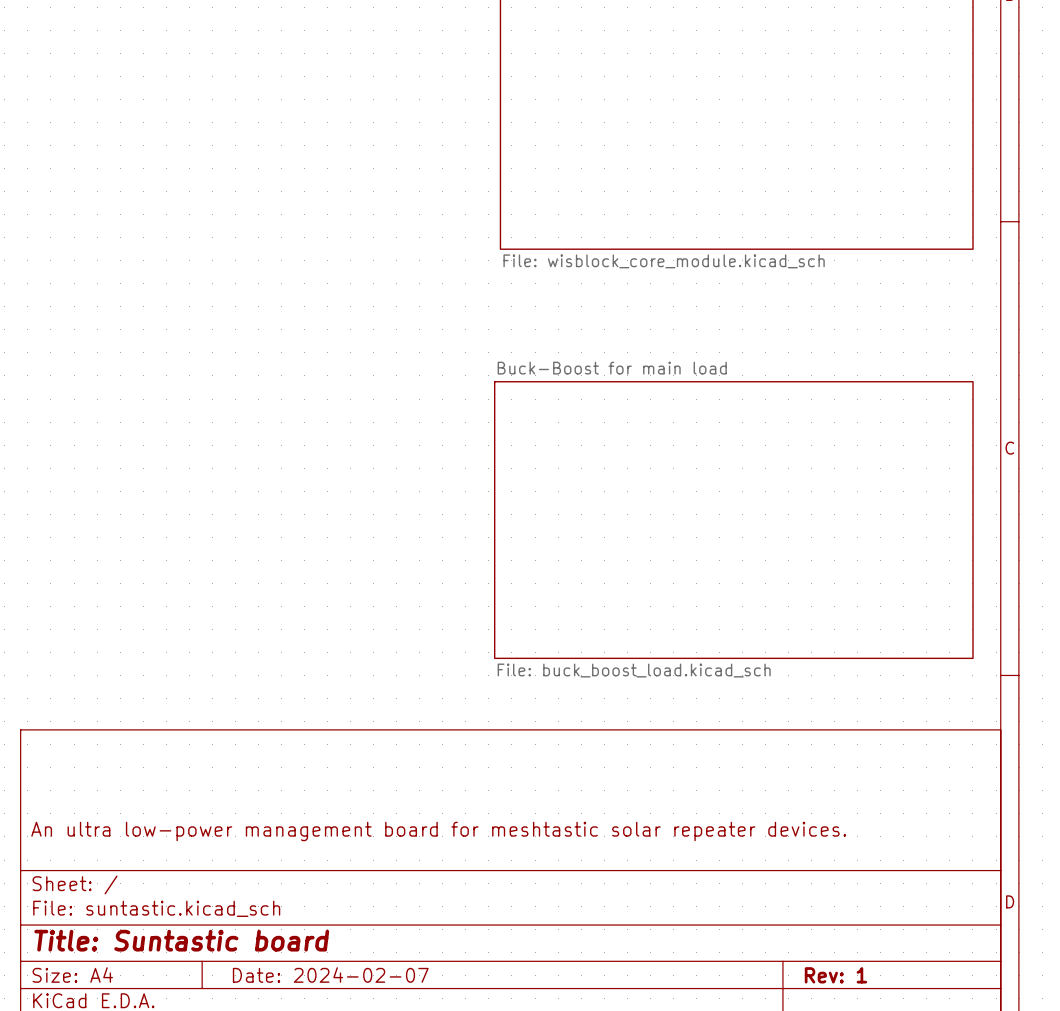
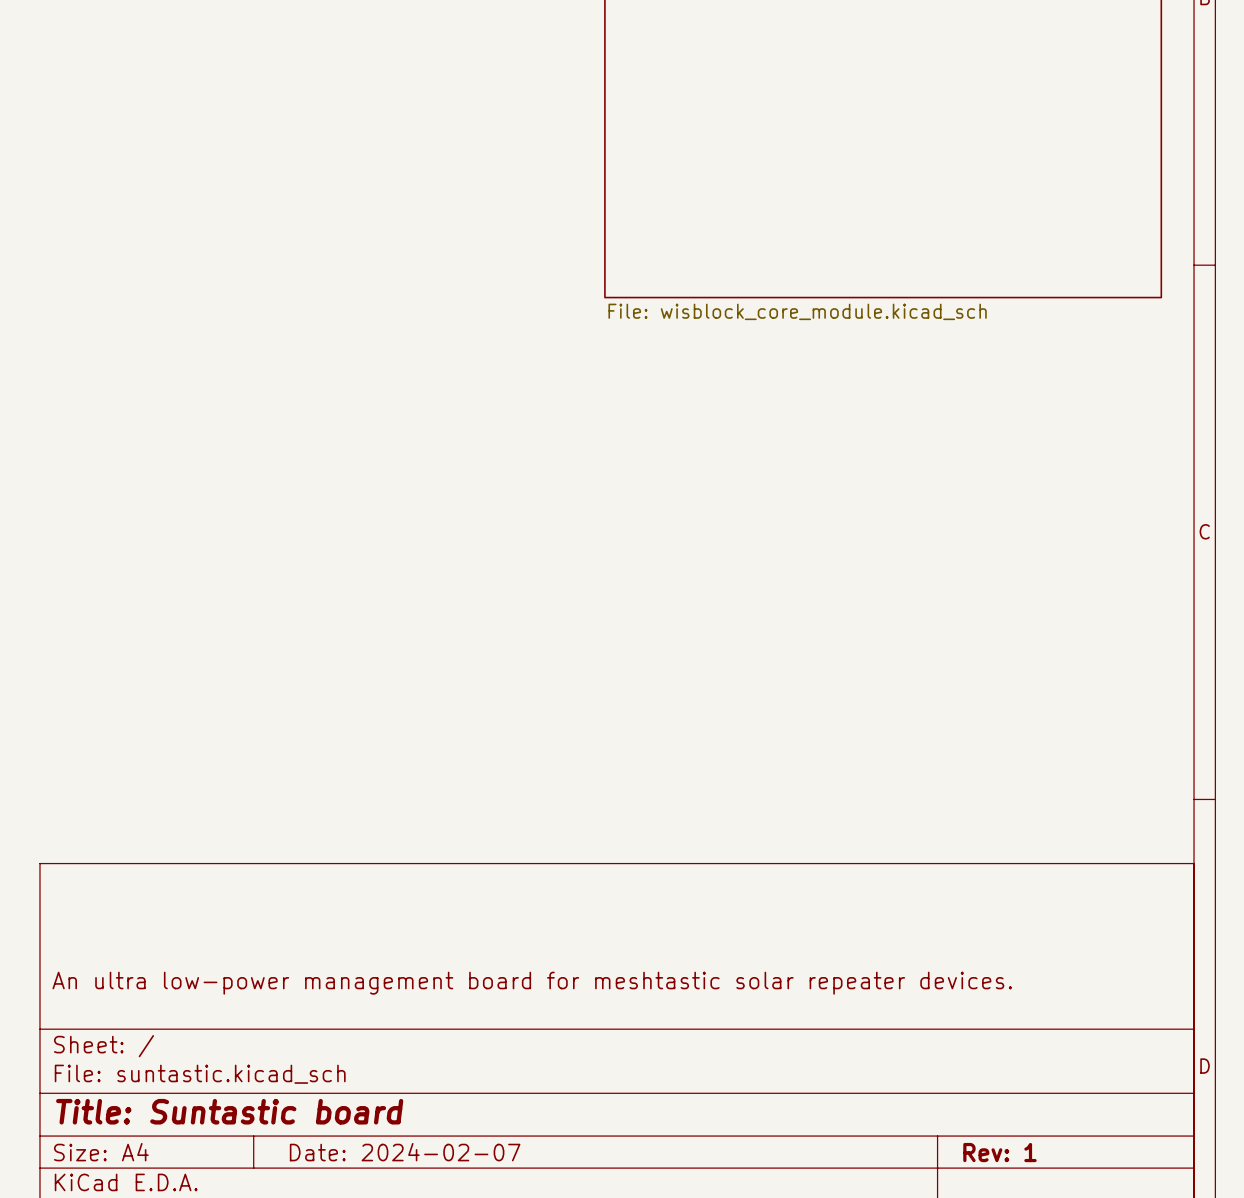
sheet Buck-Boost for main load: File: buck_boost_load.kicad_sch (733, 520) -> none

